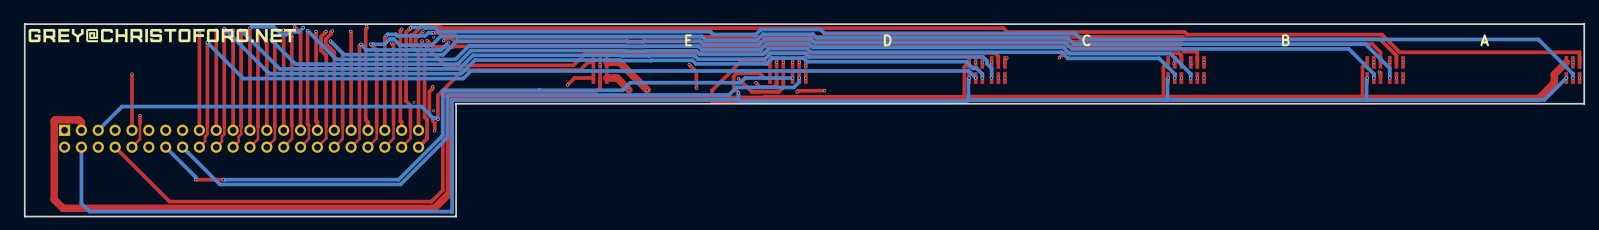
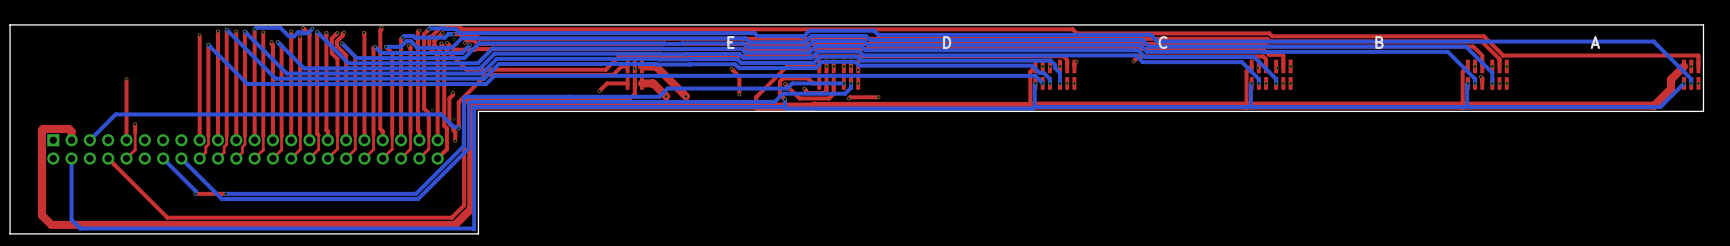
drawing: [28, 28, 296, 43] -> none

